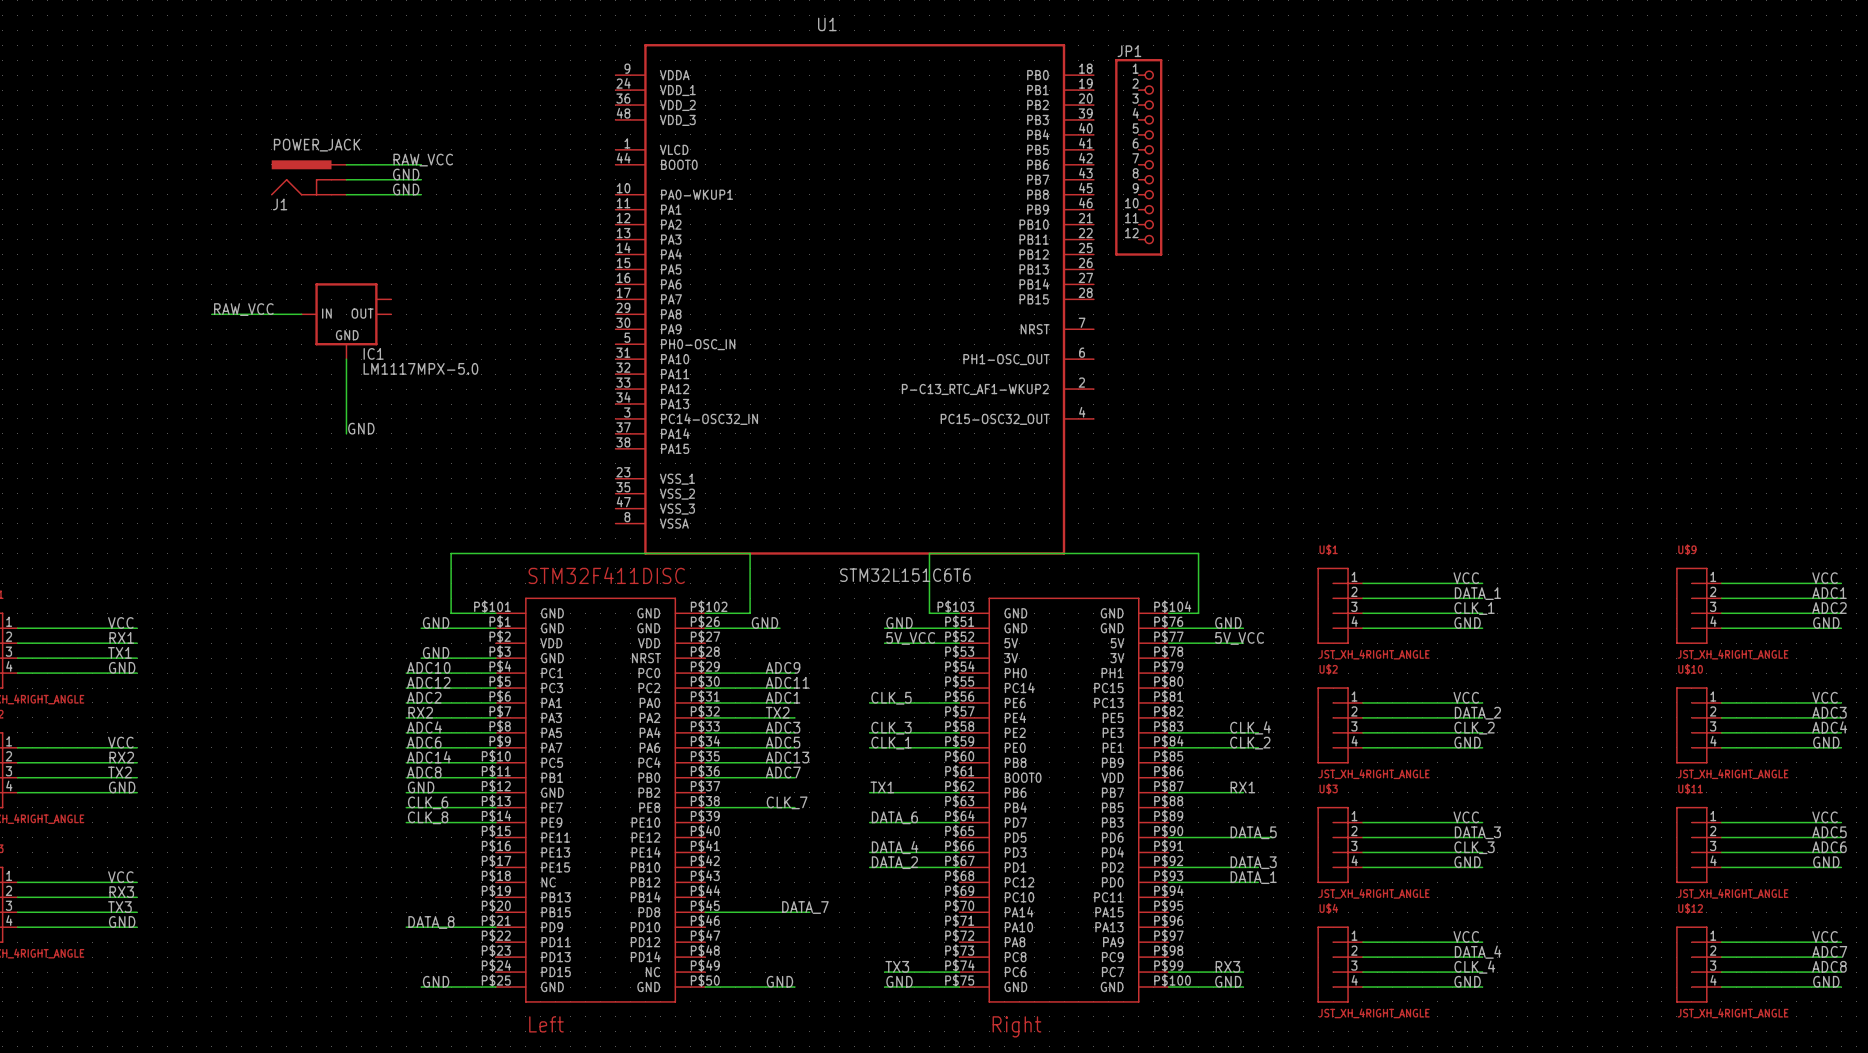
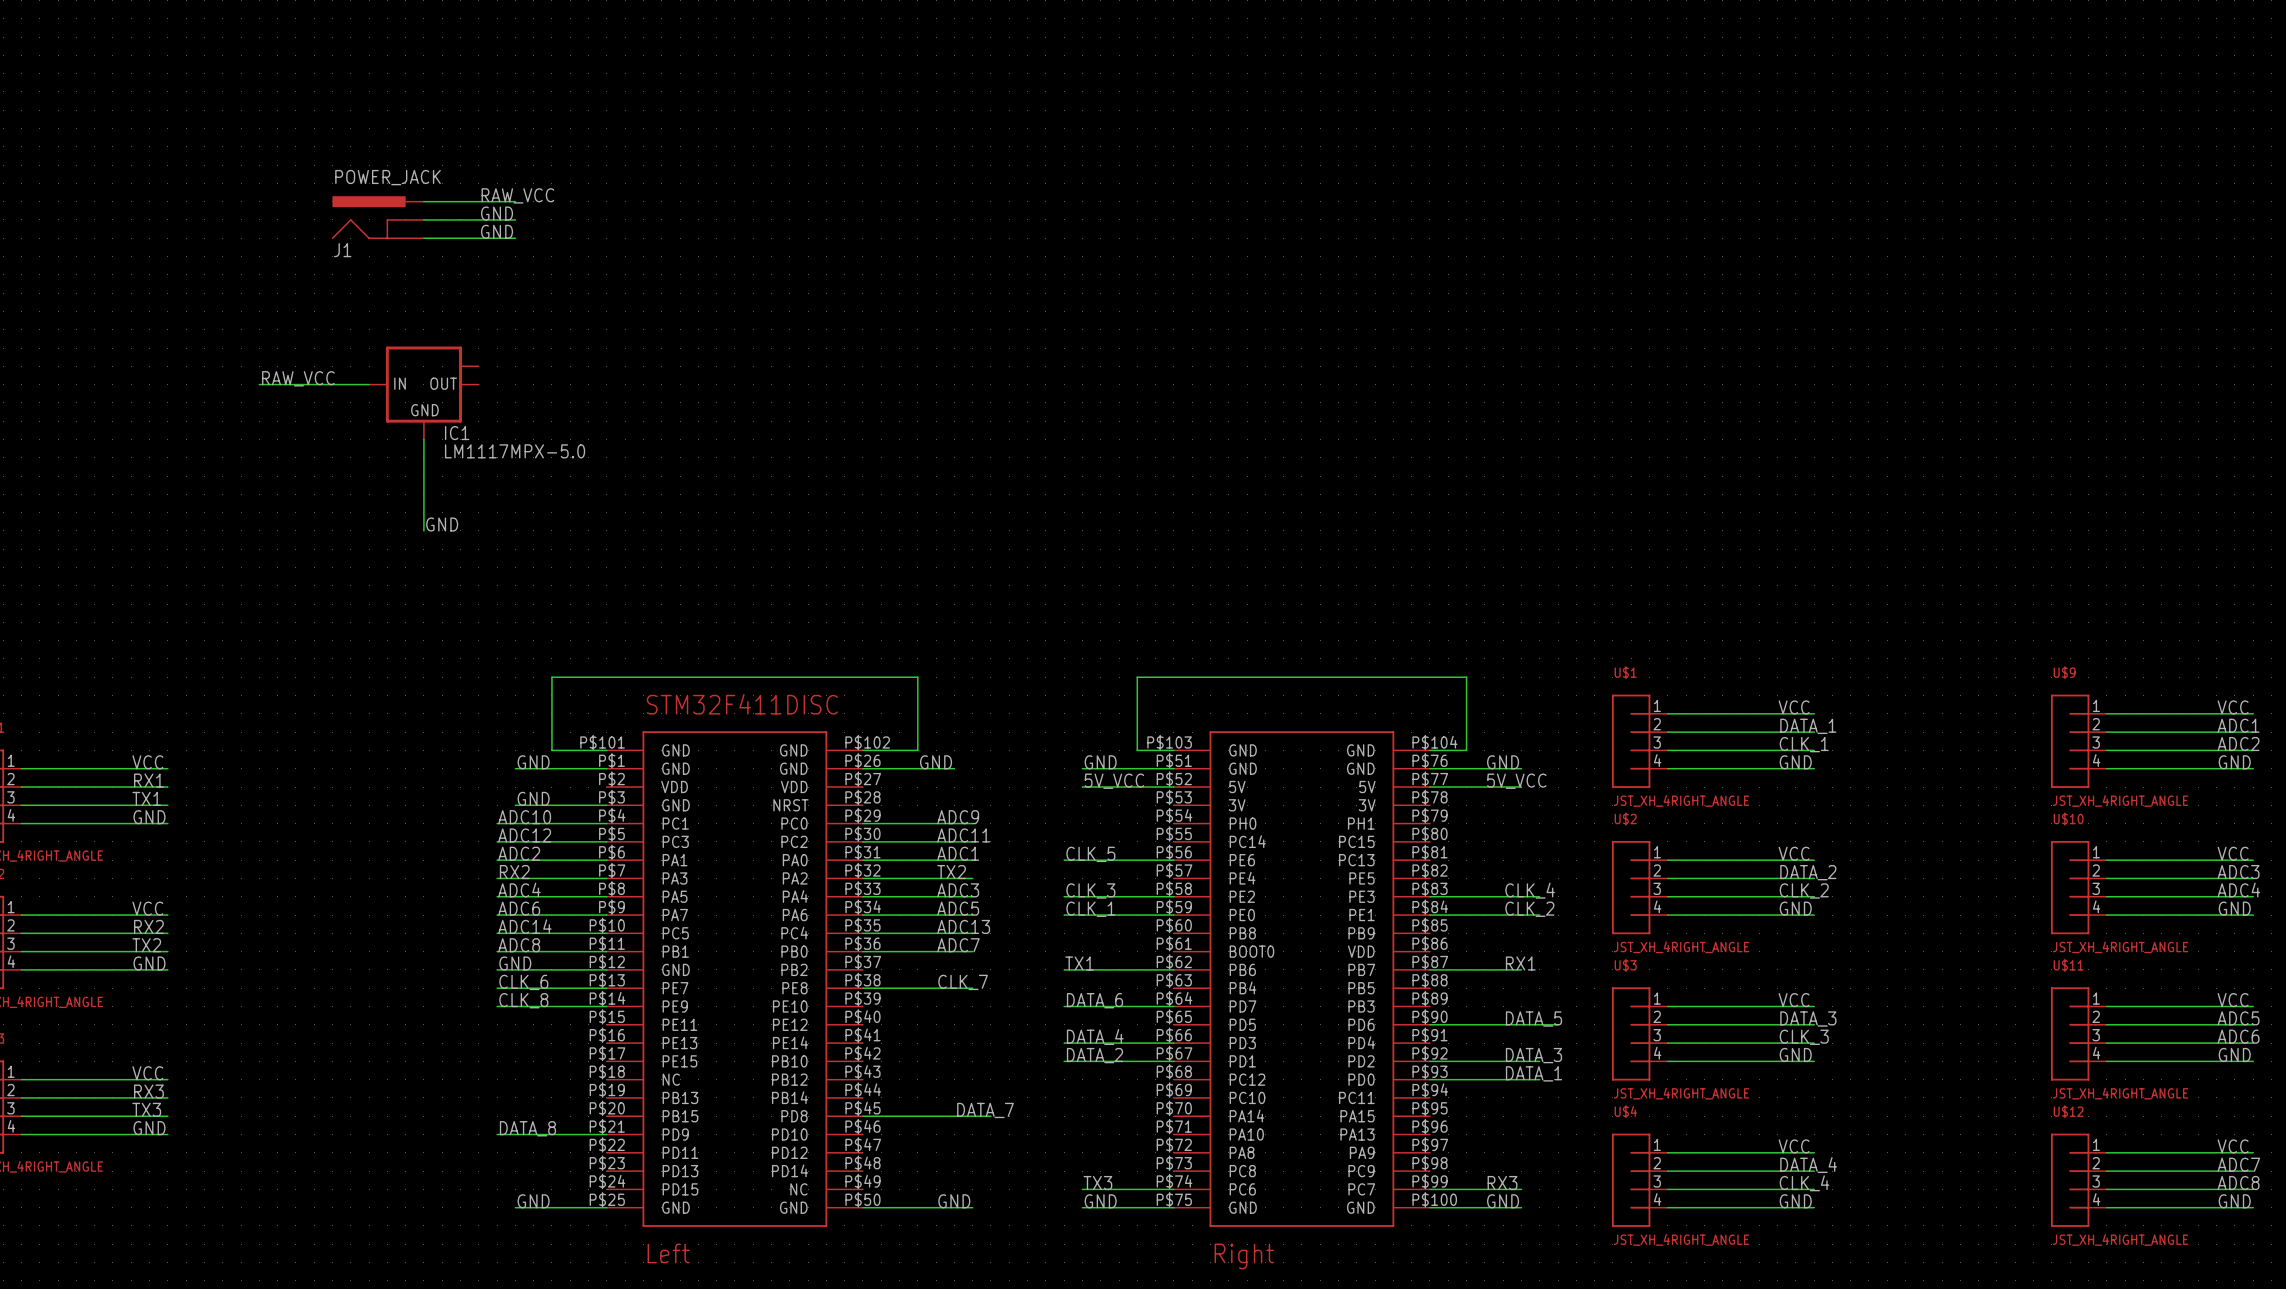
JP1: (1138, 157) -> none
U1: STM32L151C6T6 (854, 299) -> none

